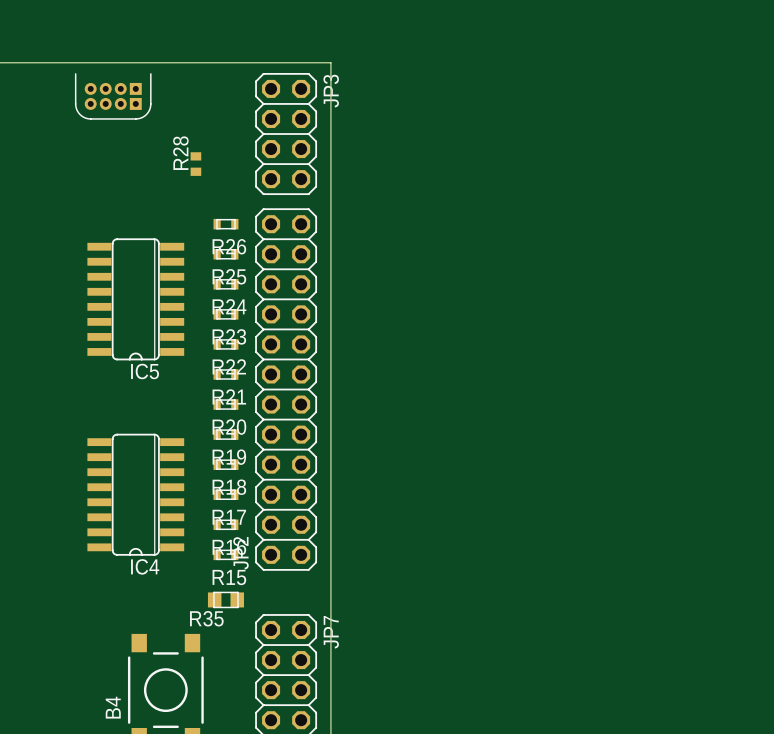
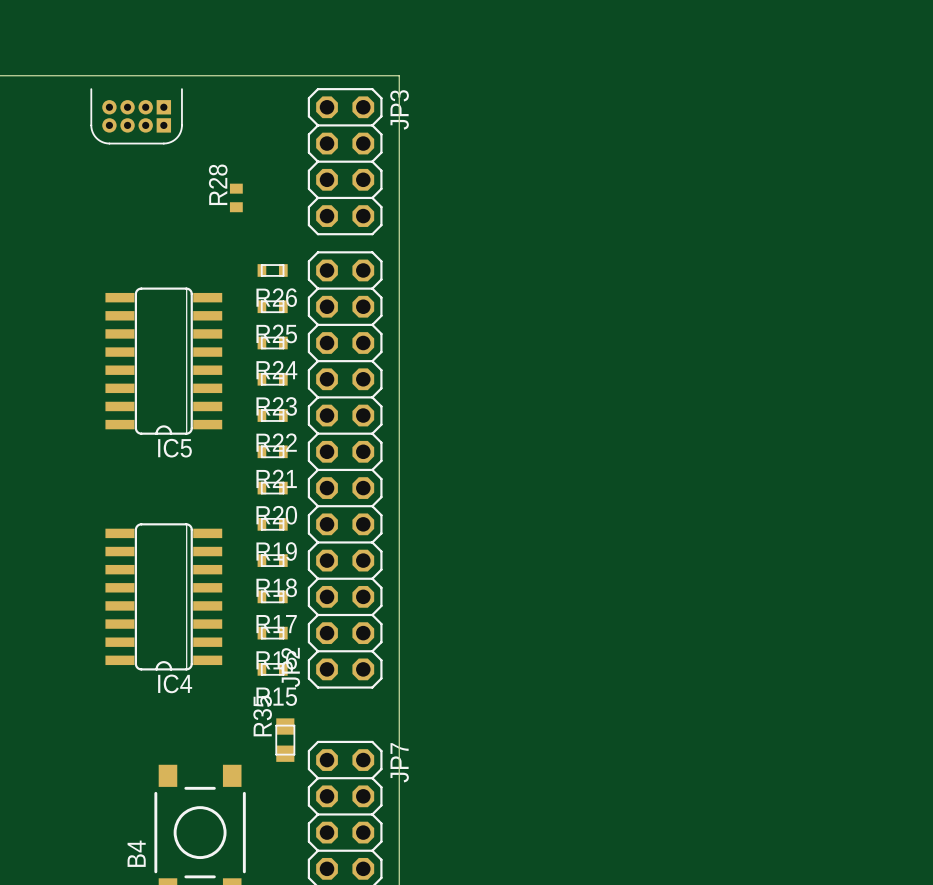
R35 rotation: 0° (225, 599) -> 90° clockwise (285, 740)

